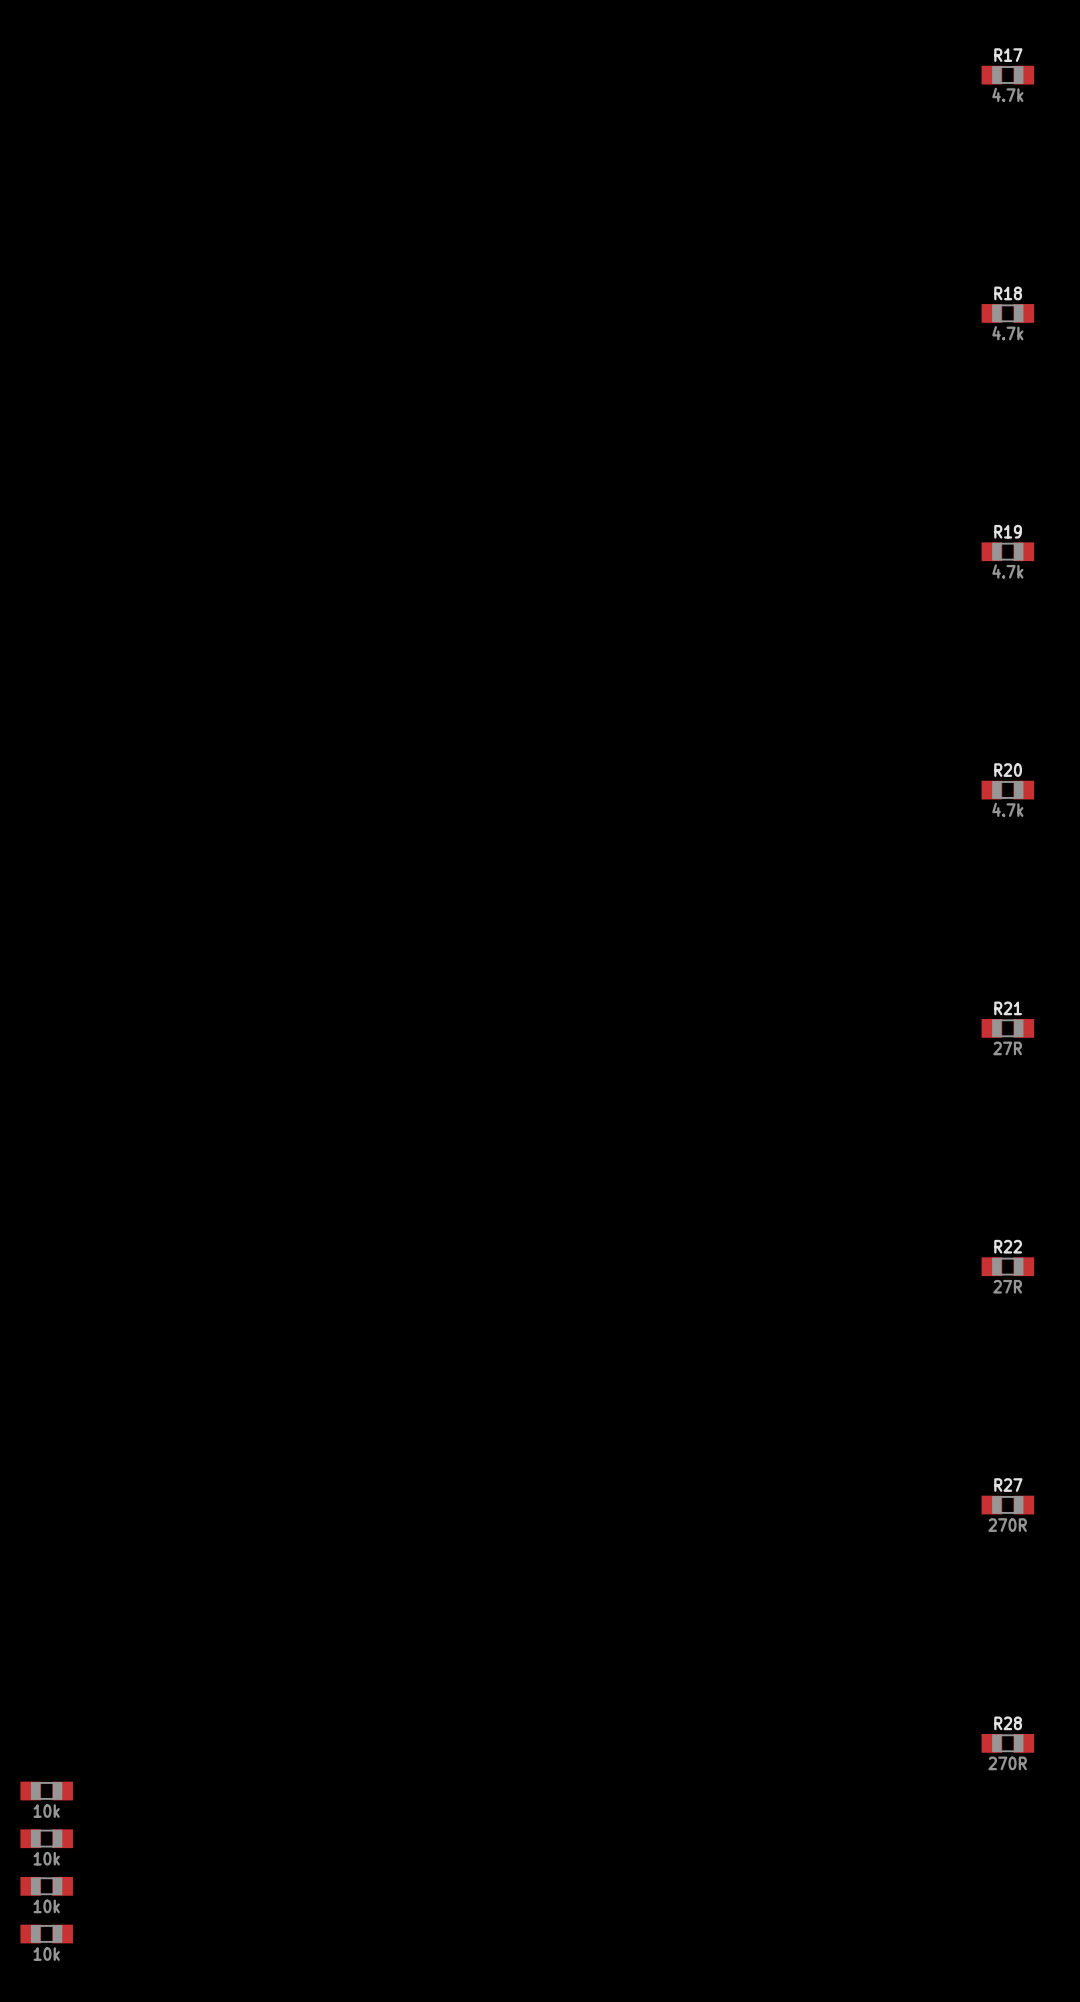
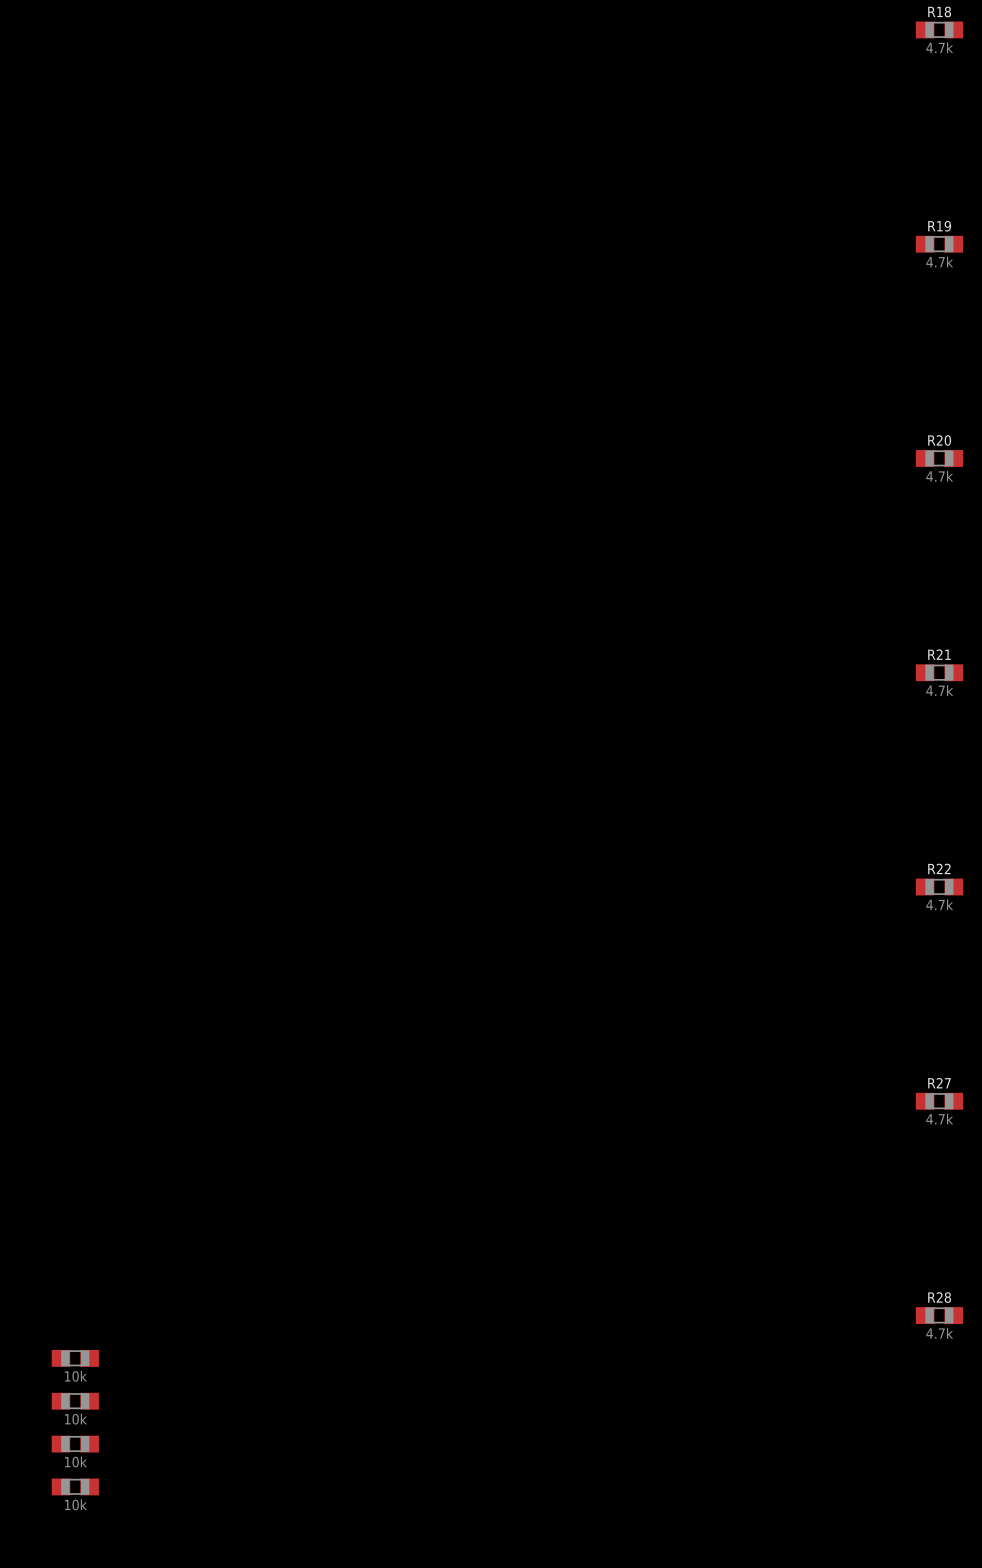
R21 value: 27R (1007, 1048) -> 4.7k (939, 690)
R22 value: 27R (1007, 1286) -> 4.7k (939, 904)
R27 value: 270R (1007, 1525) -> 4.7k (939, 1119)
R28 value: 270R (1007, 1763) -> 4.7k (939, 1333)

